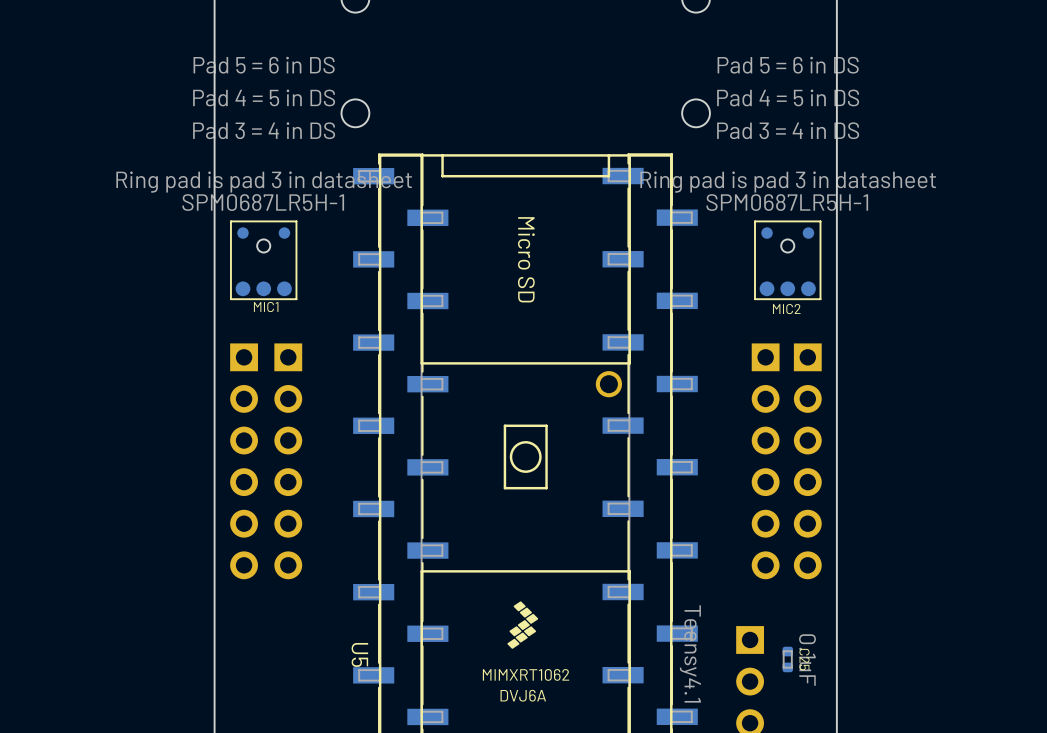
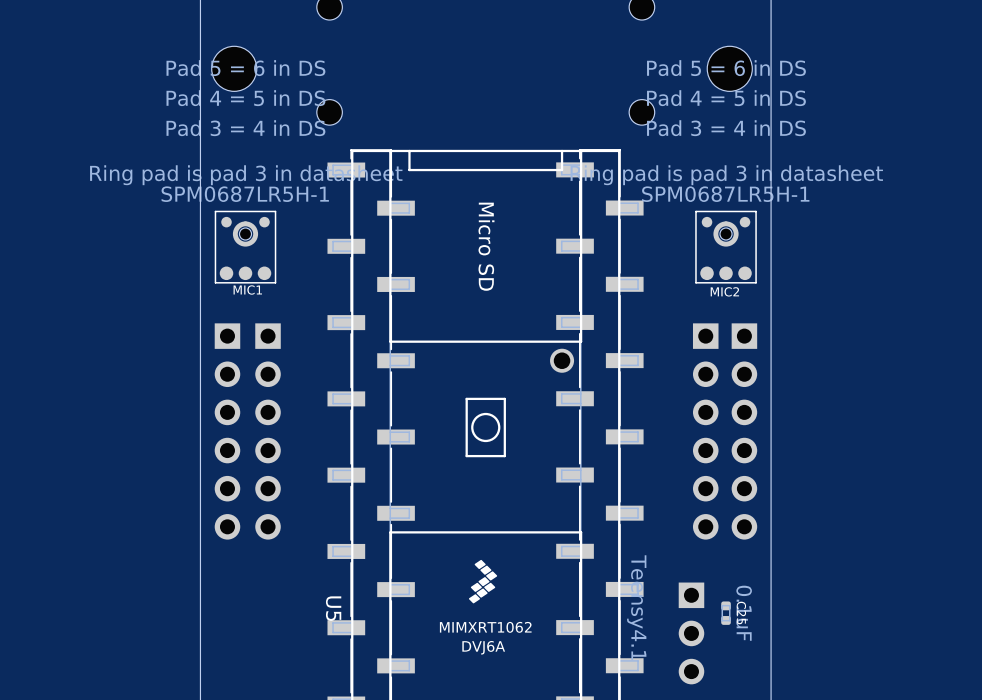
part: none -> (234, 68)
part: none -> (729, 68)
MIC1 footprint: [230, 220, 298, 301] -> [214, 210, 277, 284]
MIC2 footprint: [754, 220, 822, 301] -> [695, 210, 757, 284]

